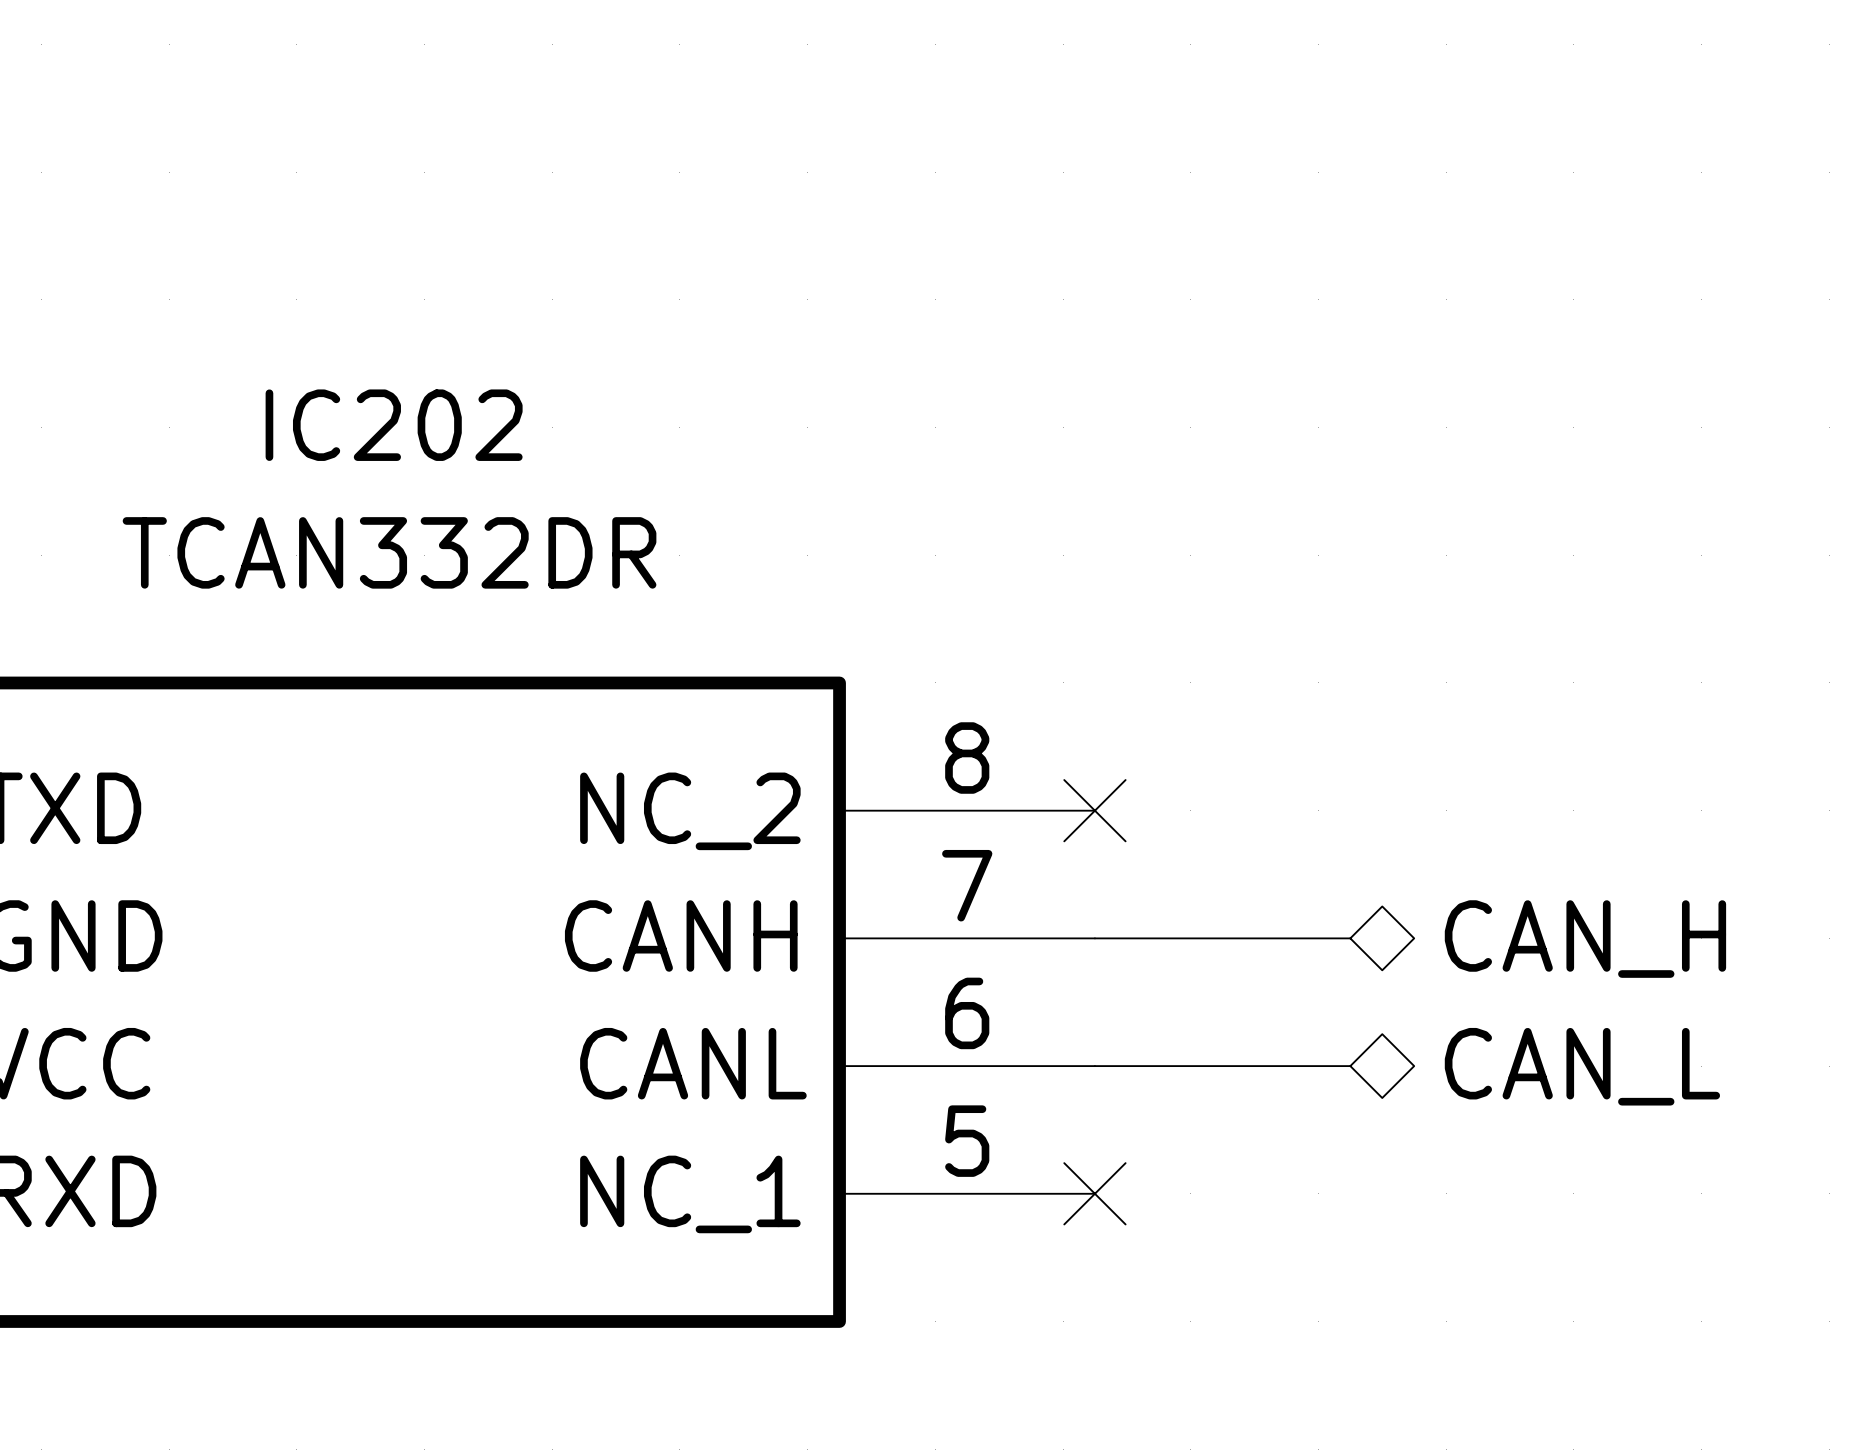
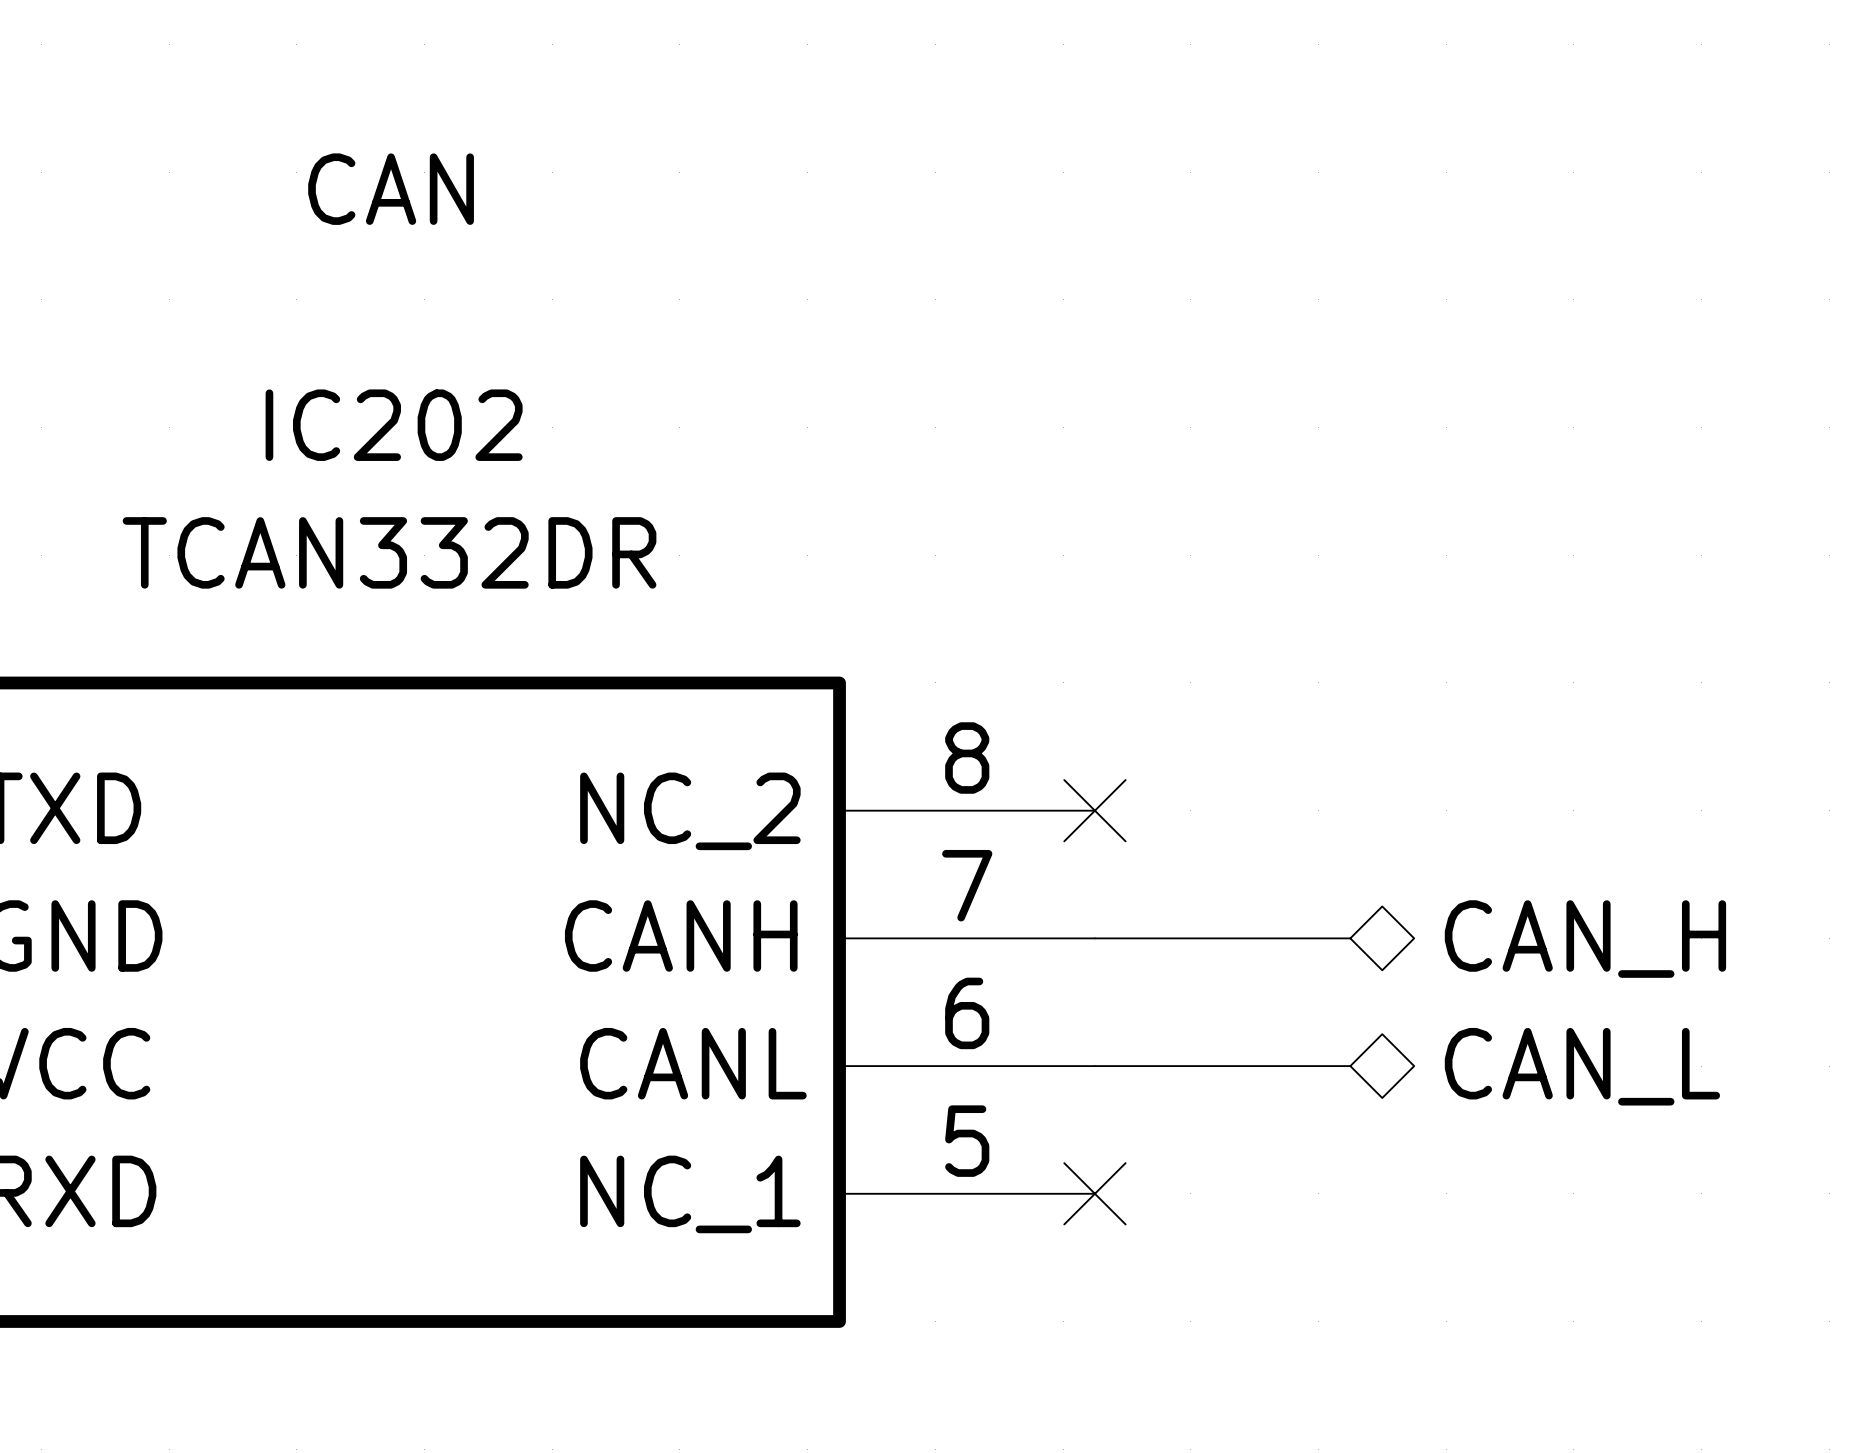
text: none -> CAN (391, 189)

